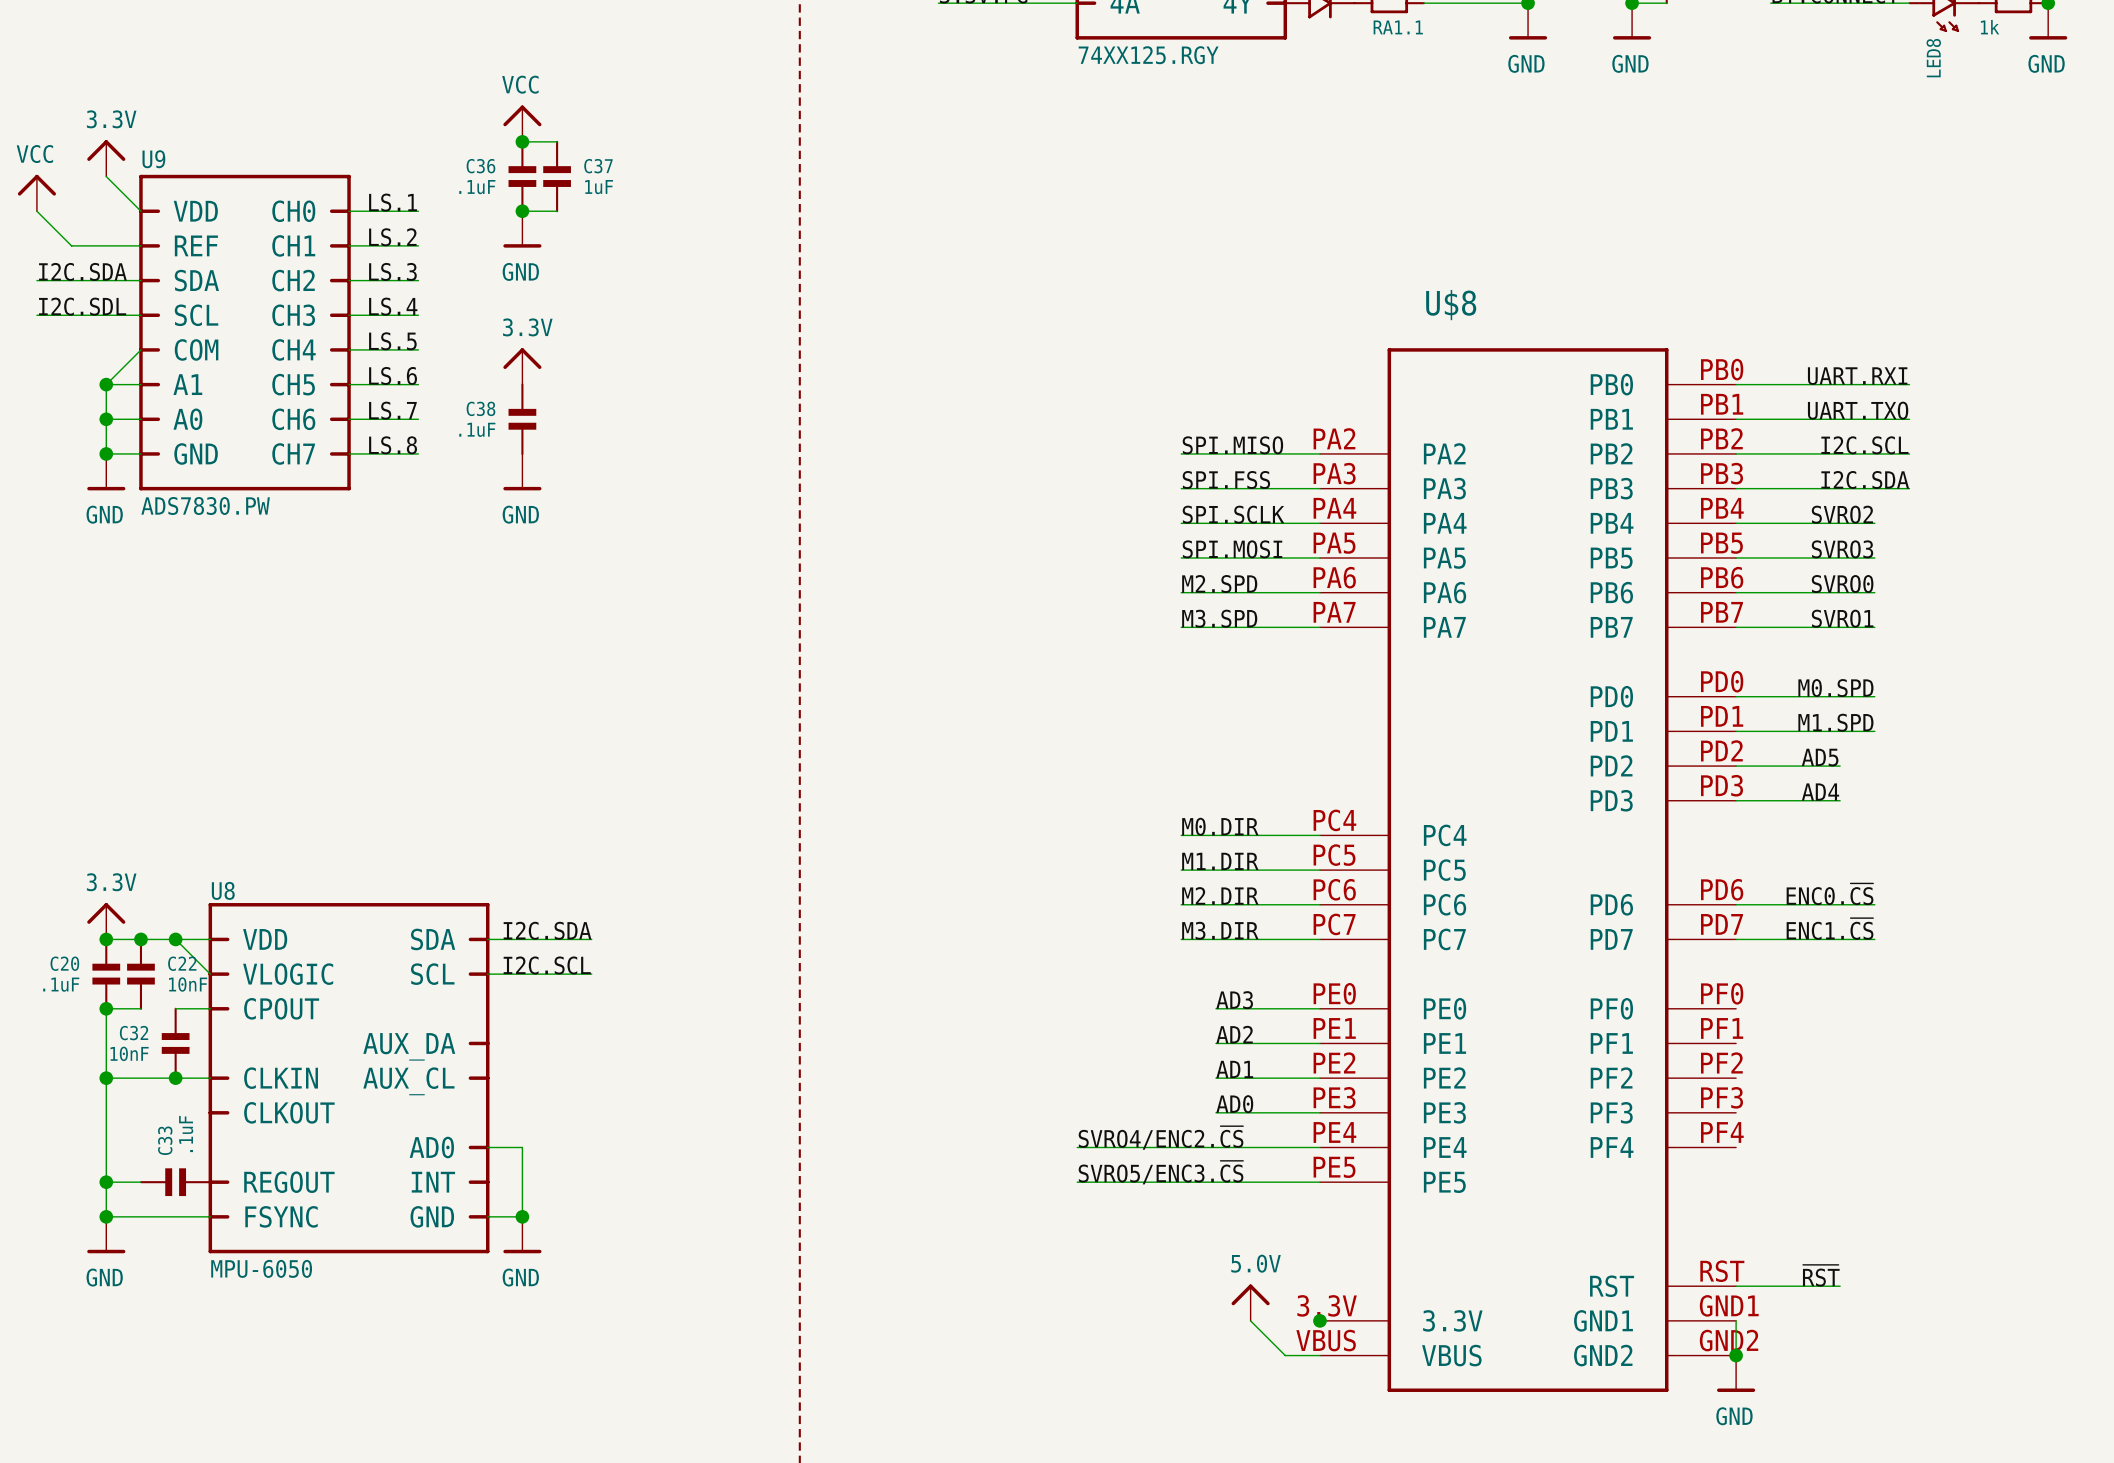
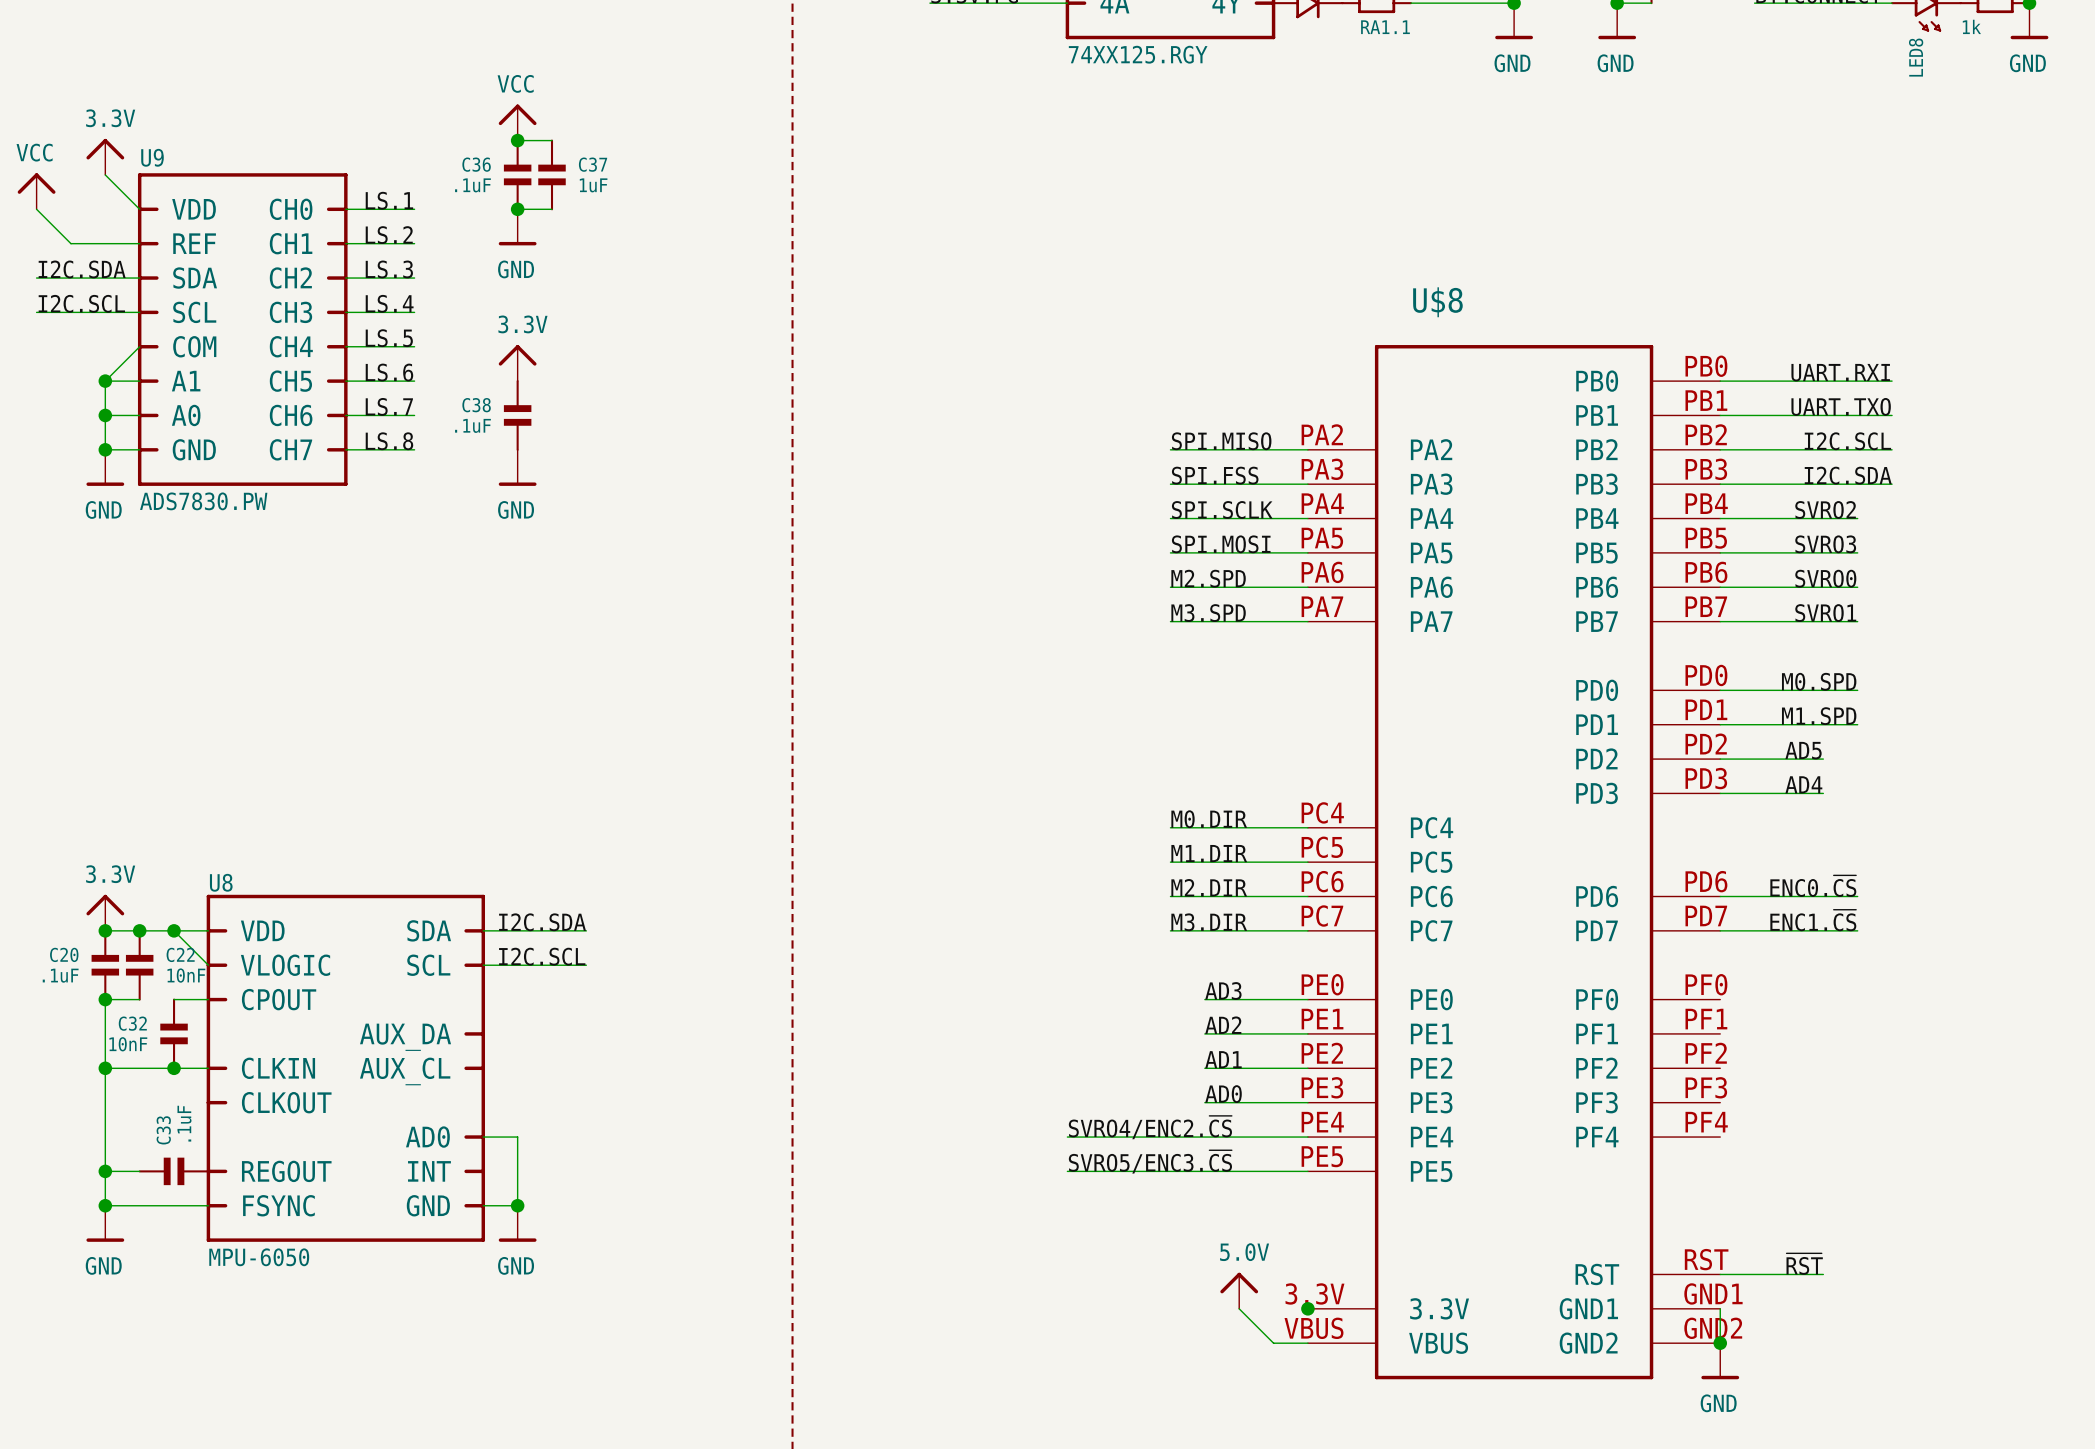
label: I2C.SDL (82, 306) -> I2C.SCL (81, 303)

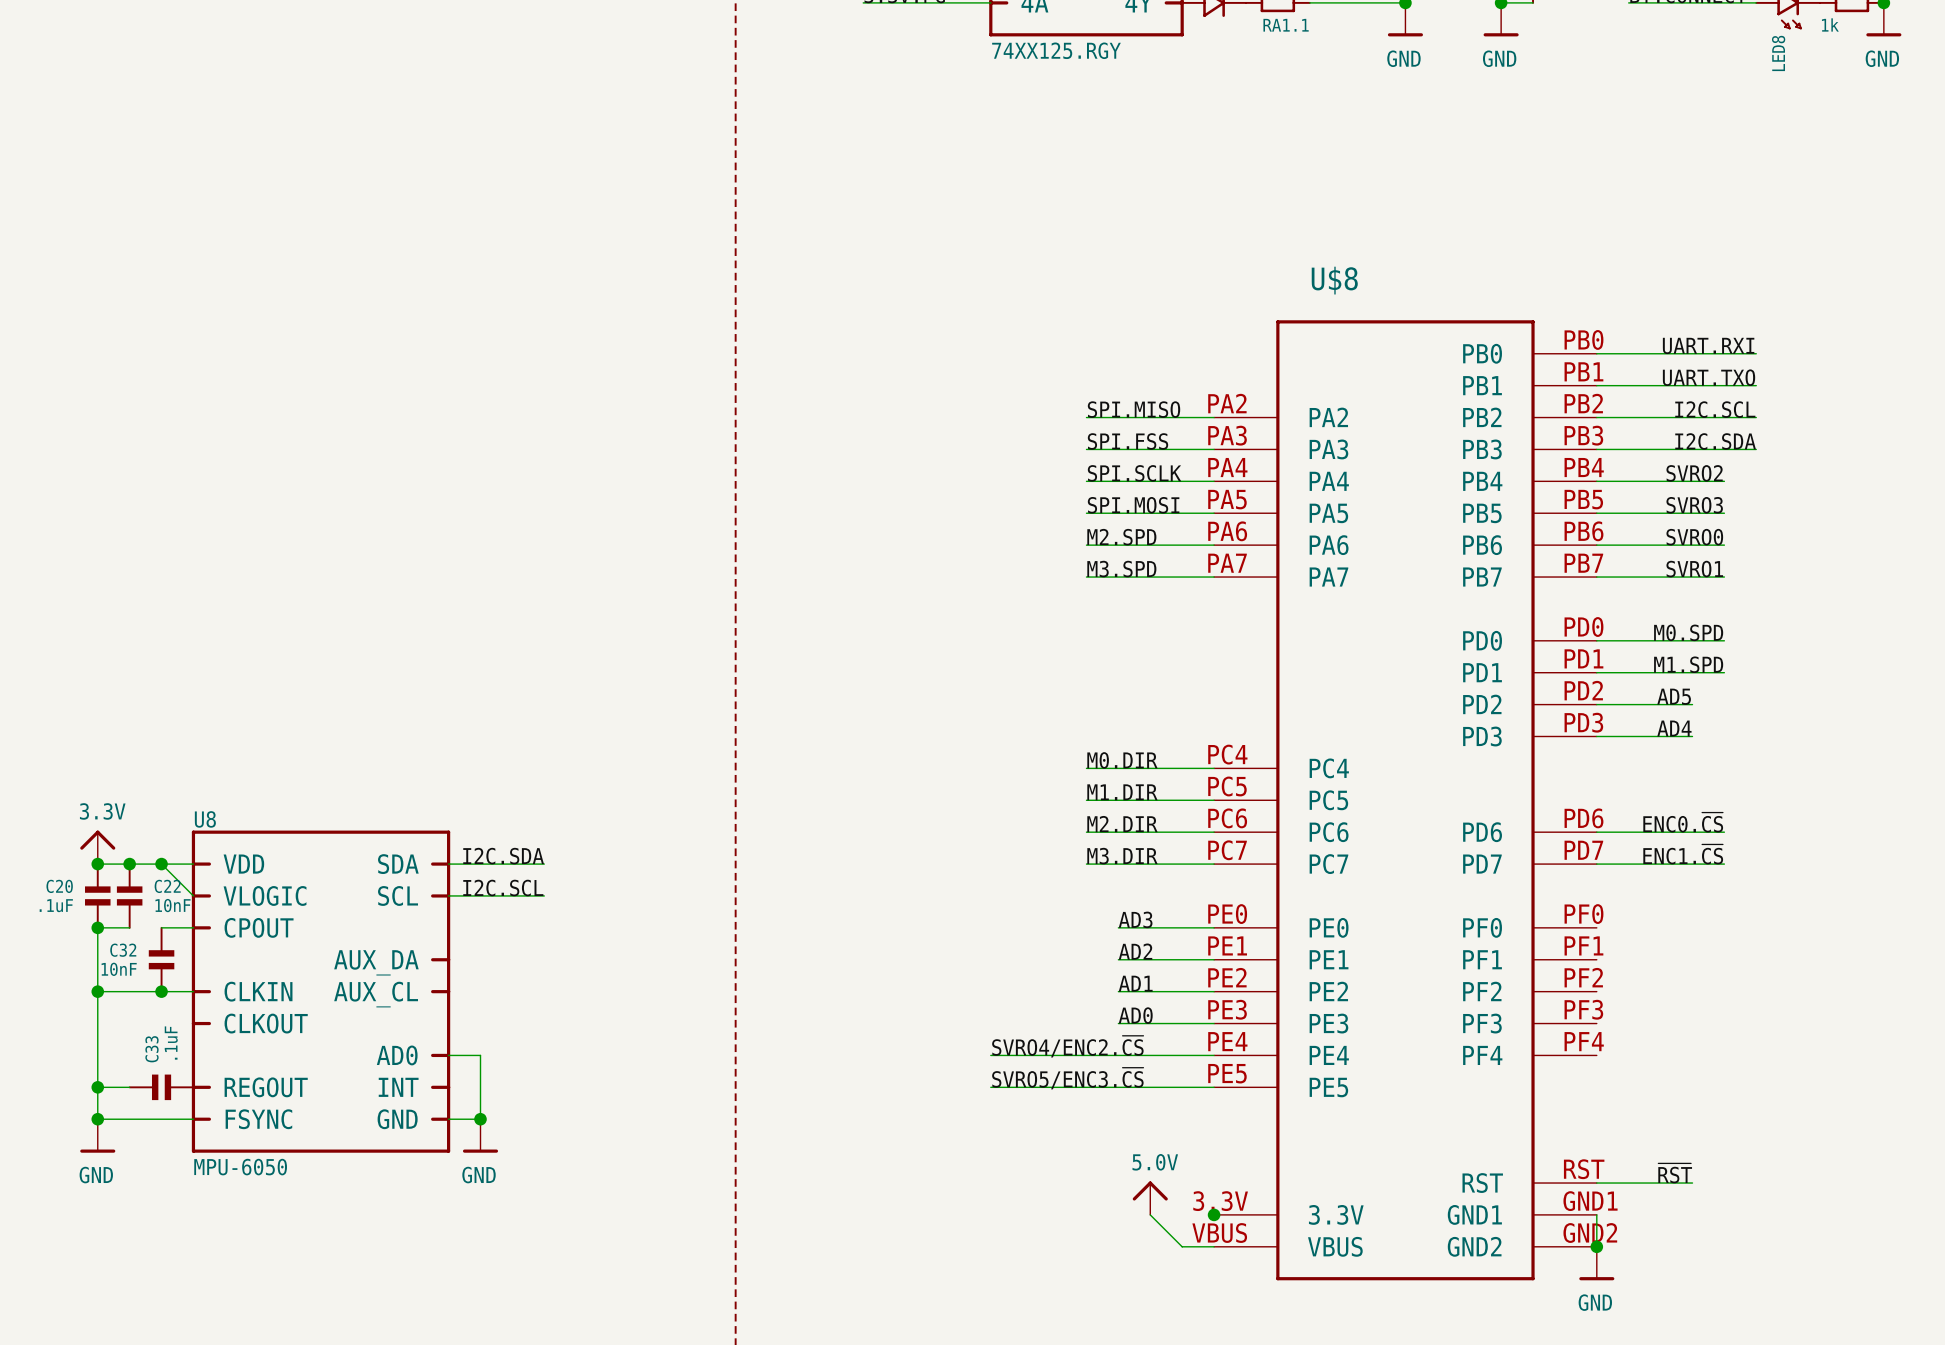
power symbol: VCC (517, 122) -> none
wire: (517, 140) (552, 140) -> none
junction: (517, 140) -> none
power symbol: 3.3V (105, 156) -> none
wire: (105, 174) (139, 209) -> none
C36: .1uF (517, 174) -> none
C37: 1uF (552, 174) -> none
power symbol: VCC (36, 191) -> none
label: LS.1 (389, 200) -> none
wire: (36, 209) (70, 243) (139, 243) -> none
wire: (345, 209) (414, 209) -> none
wire: (517, 209) (552, 209) -> none
junction: (517, 209) -> none
power symbol: GND (517, 227) -> none
label: LS.2 (389, 235) -> none
wire: (345, 243) (414, 243) -> none
label: I2C.SDA (82, 269) -> none
label: LS.3 (389, 269) -> none
wire: (36, 278) (139, 278) -> none
wire: (345, 278) (414, 278) -> none
label: I2C.SCL (81, 303) -> none
label: LS.4 (389, 303) -> none
wire: (36, 312) (139, 312) -> none
wire: (345, 312) (414, 312) -> none
U9: ADS7830.PW (242, 329) -> none
label: LS.5 (389, 338) -> none
wire: (139, 346) (105, 381) -> none
wire: (345, 346) (414, 346) -> none
power symbol: 3.3V (517, 363) -> none
label: LS.6 (389, 372) -> none
wire: (105, 381) (105, 449) (139, 449) -> none
wire: (105, 381) (139, 381) -> none
junction: (105, 381) -> none
wire: (345, 381) (414, 381) -> none
label: LS.7 (389, 406) -> none
wire: (105, 415) (139, 415) -> none
junction: (105, 415) -> none
wire: (345, 415) (414, 415) -> none
C38: .1uF (517, 415) -> none
label: LS.8 (389, 441) -> none
junction: (105, 449) -> none
wire: (345, 449) (414, 449) -> none
power symbol: GND (105, 467) -> none
power symbol: GND (517, 467) -> none

